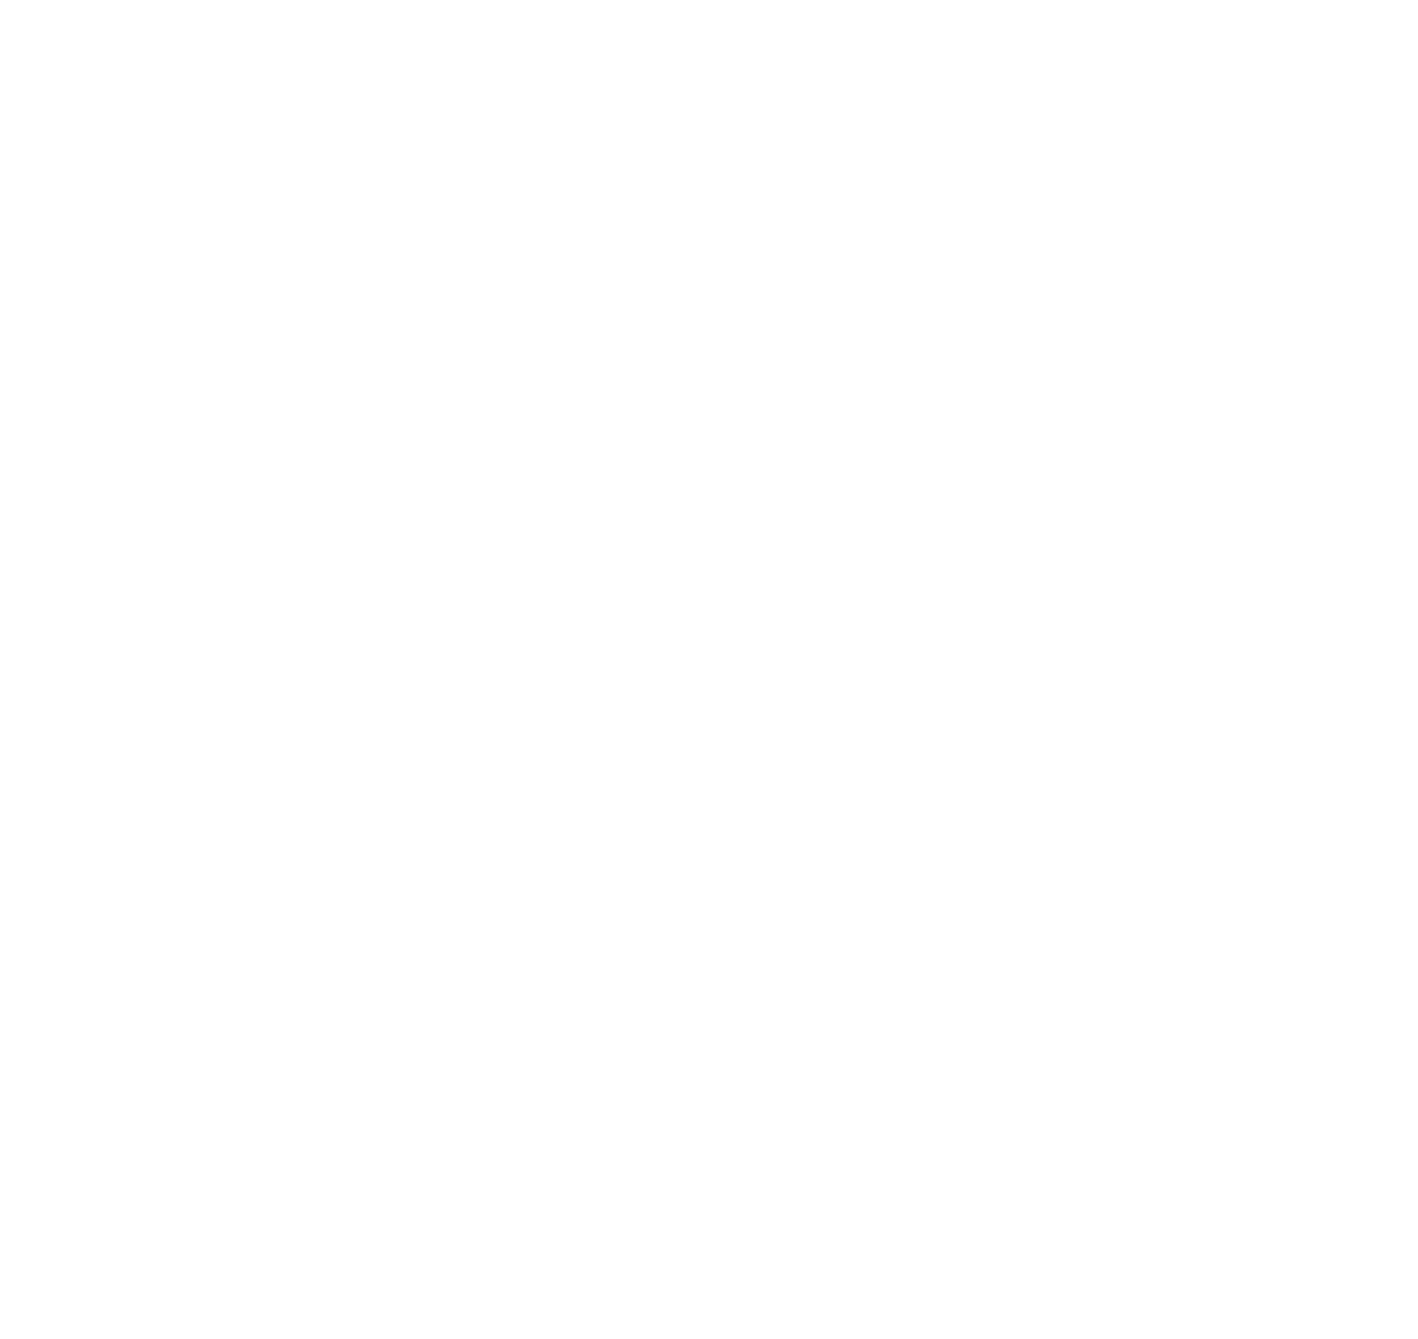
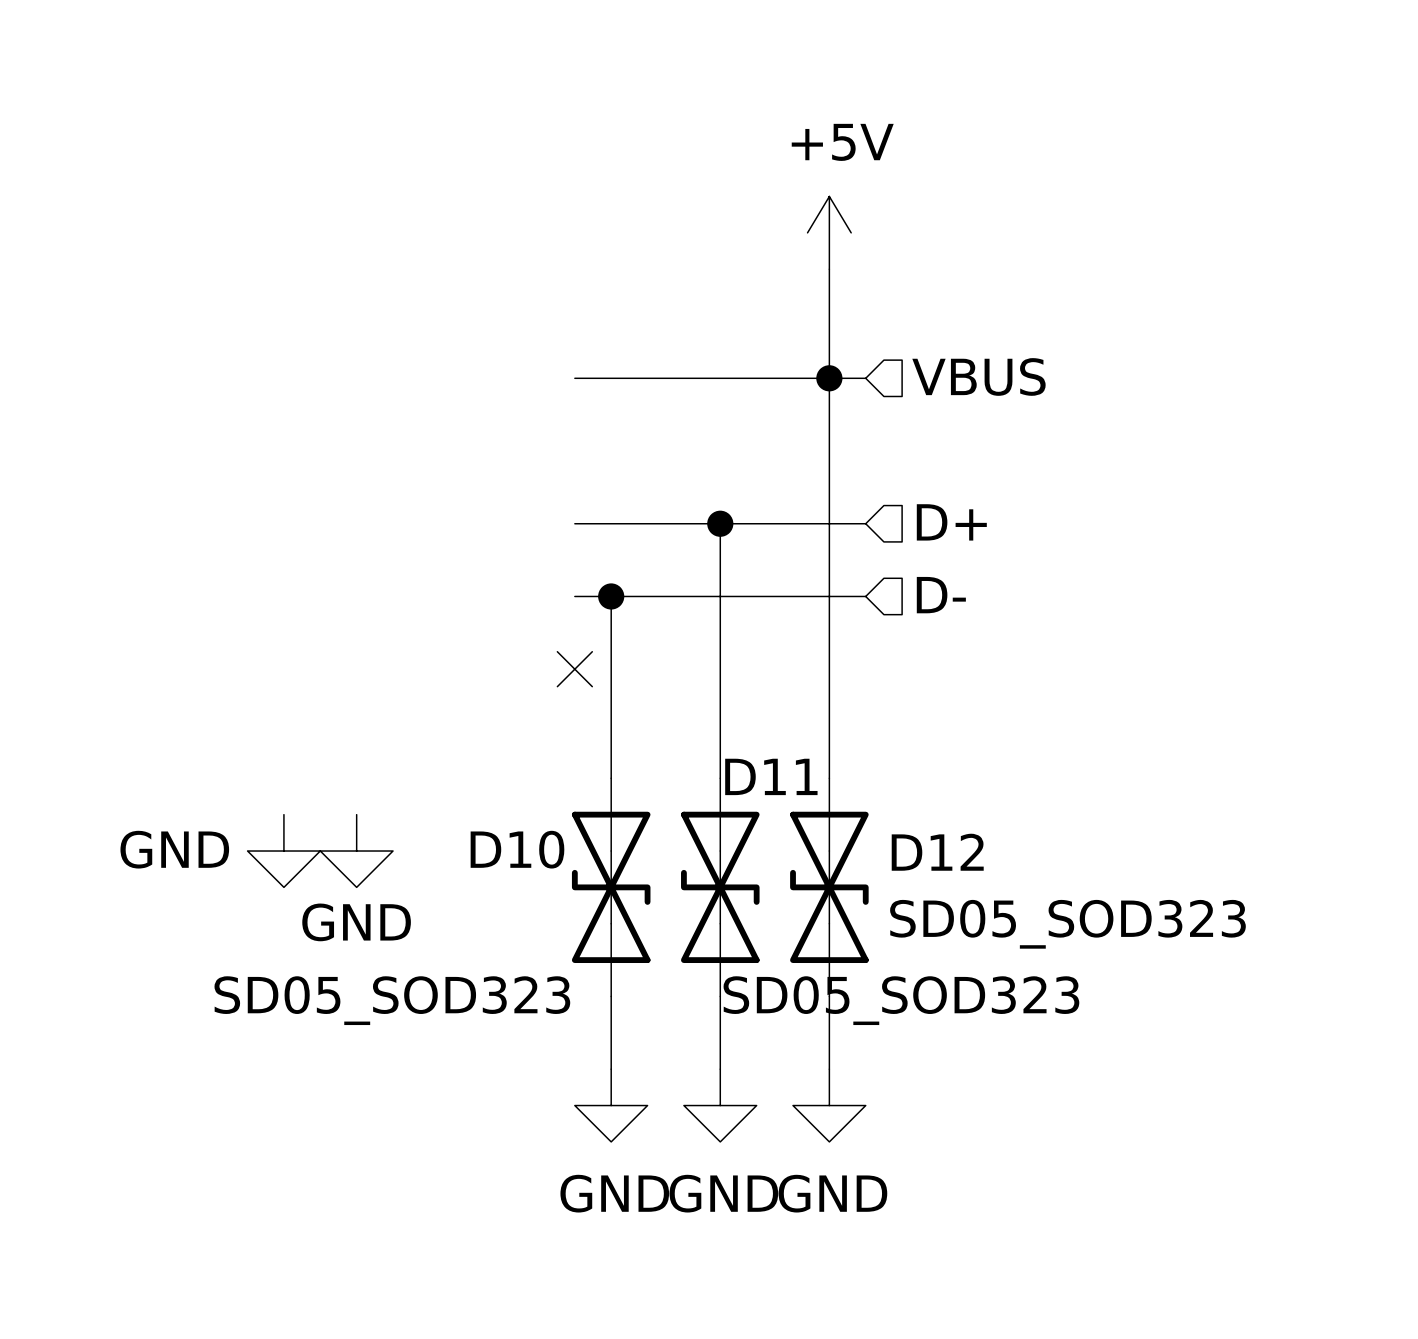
power symbol: none -> +5V (829, 232)
wire: none -> (829, 269) (829, 778)
hierarchical label: none -> VBUS (978, 376)
wire: none -> (574, 378) (865, 378)
junction: none -> (829, 378)
hierarchical label: none -> D+ (951, 522)
wire: none -> (574, 523) (865, 523)
wire: none -> (720, 523) (720, 778)
junction: none -> (720, 523)
hierarchical label: none -> D- (941, 595)
wire: none -> (574, 596) (865, 596)
wire: none -> (611, 596) (611, 778)
junction: none -> (611, 596)
no-connect mark: none -> (574, 669)
power symbol: none -> GND (283, 851)
power symbol: none -> GND (356, 851)
D10: none -> SD05_SOD323 (611, 887)
D11: none -> SD05_SOD323 (720, 887)
D12: none -> SD05_SOD323 (829, 887)
wire: none -> (611, 996) (611, 1069)
wire: none -> (720, 996) (720, 1069)
wire: none -> (829, 996) (829, 1069)
power symbol: none -> GND (611, 1105)
power symbol: none -> GND (720, 1105)
power symbol: none -> GND (829, 1105)

